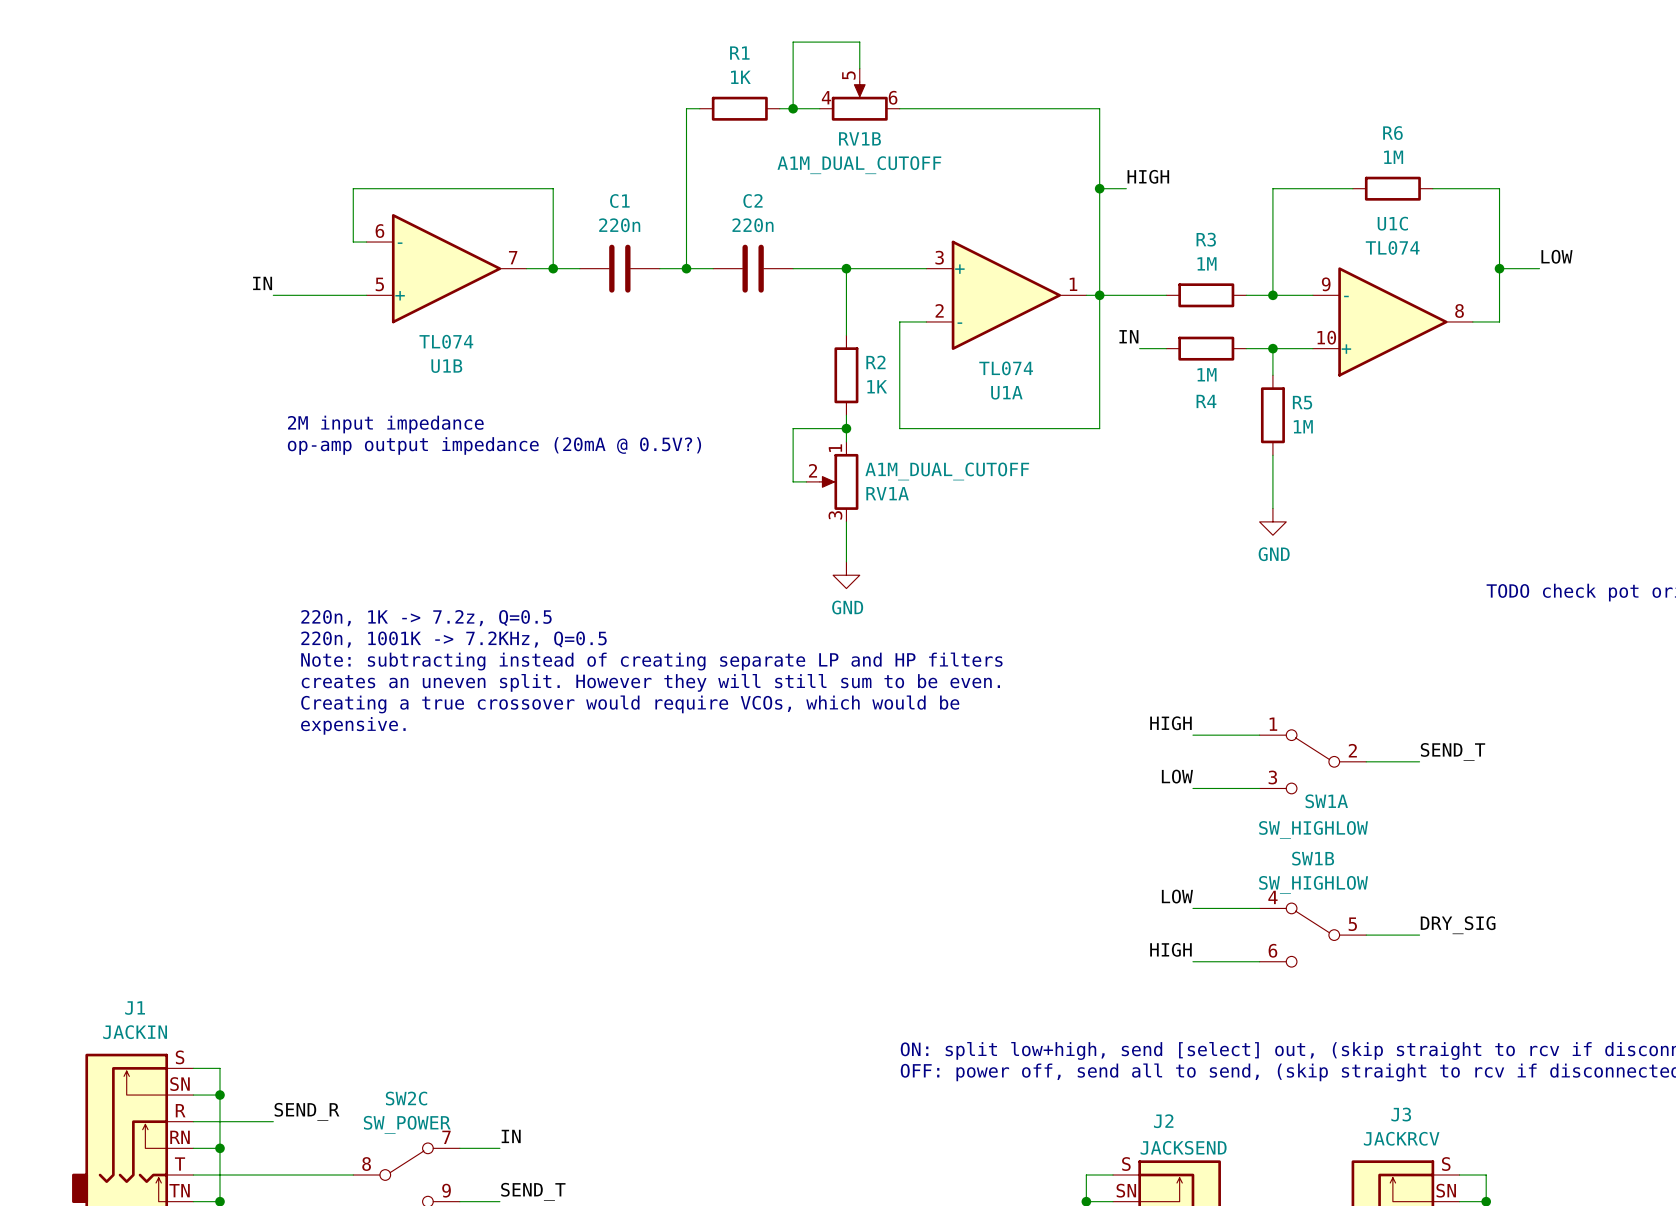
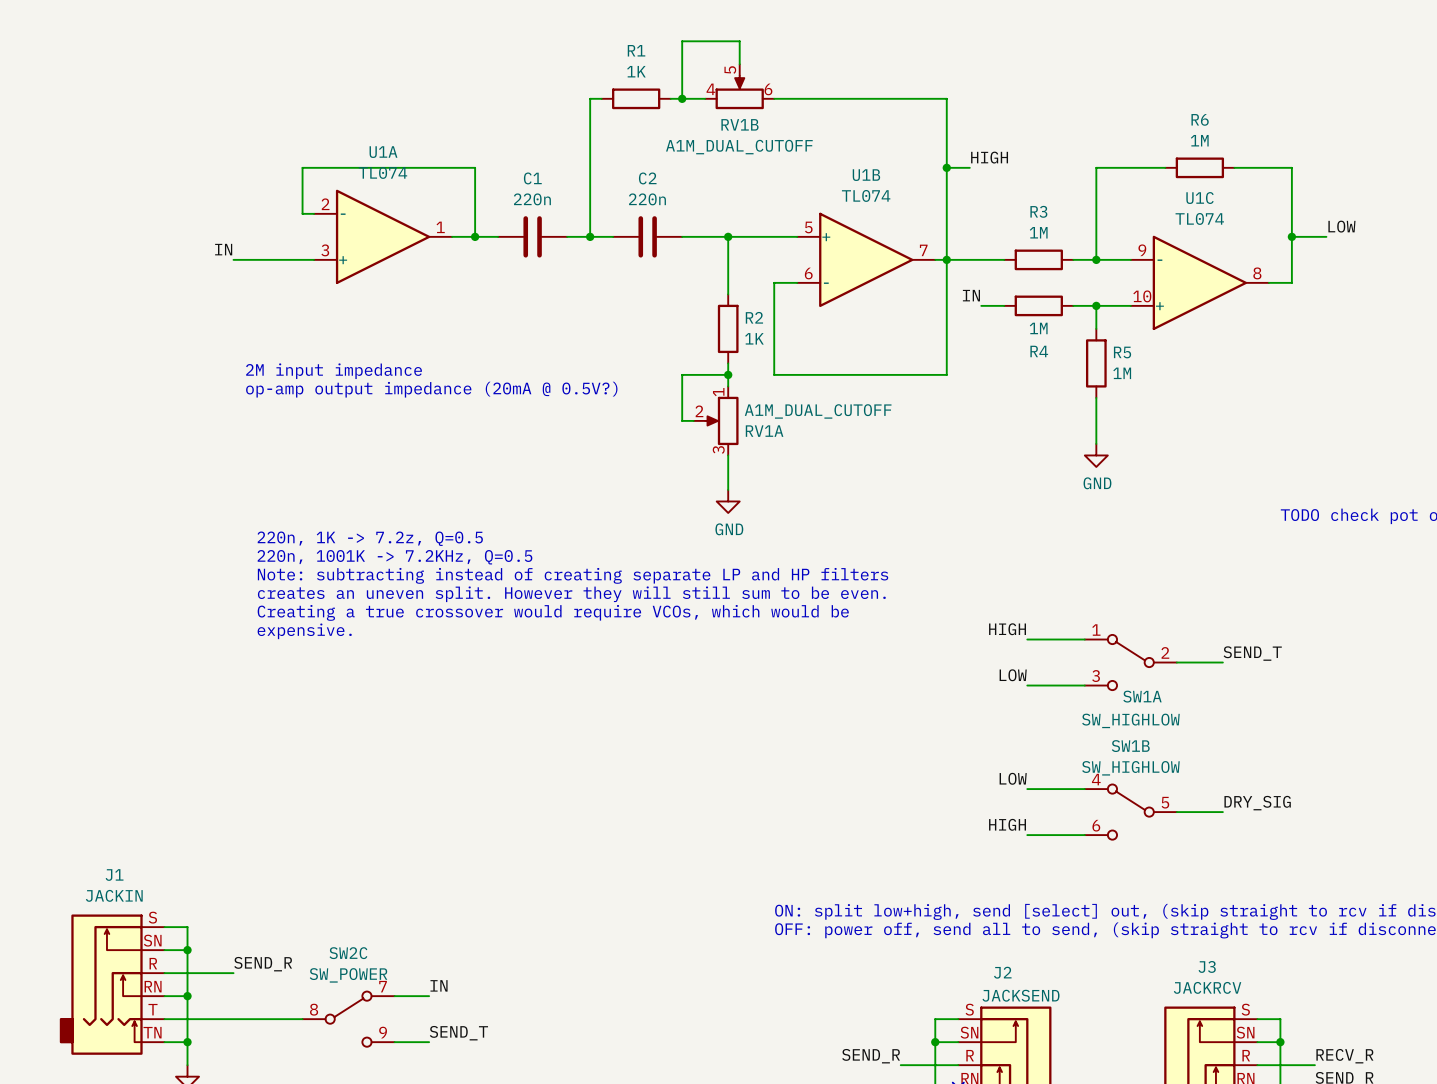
U1B flip: as is (446, 268) -> up-down (866, 259)
U1B position: (446, 268) -> (866, 259)
U1A flip: as is (1006, 295) -> up-down (383, 236)
U1A position: (1006, 295) -> (383, 236)

